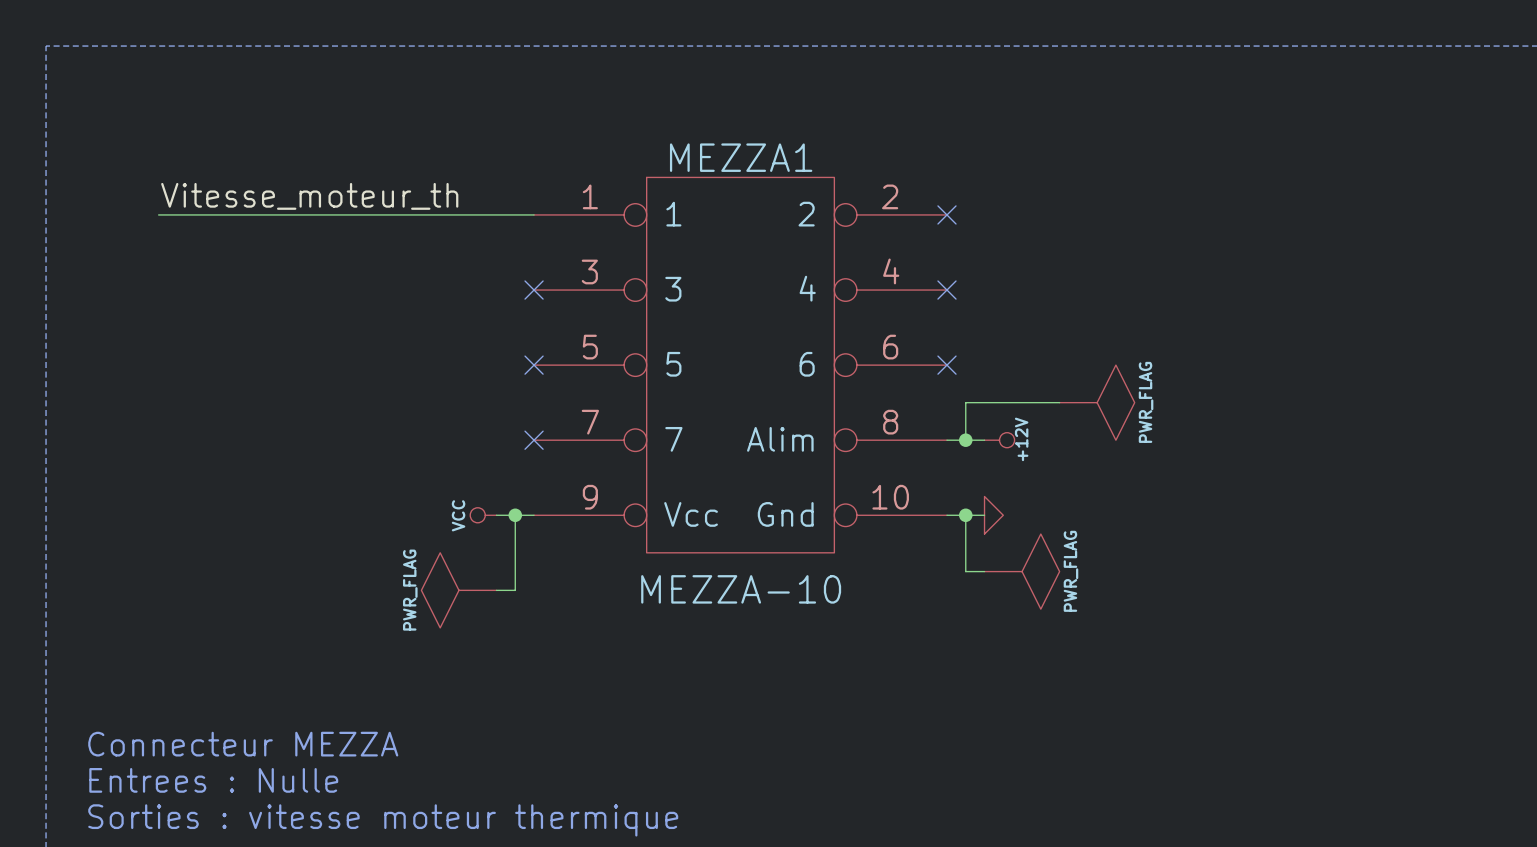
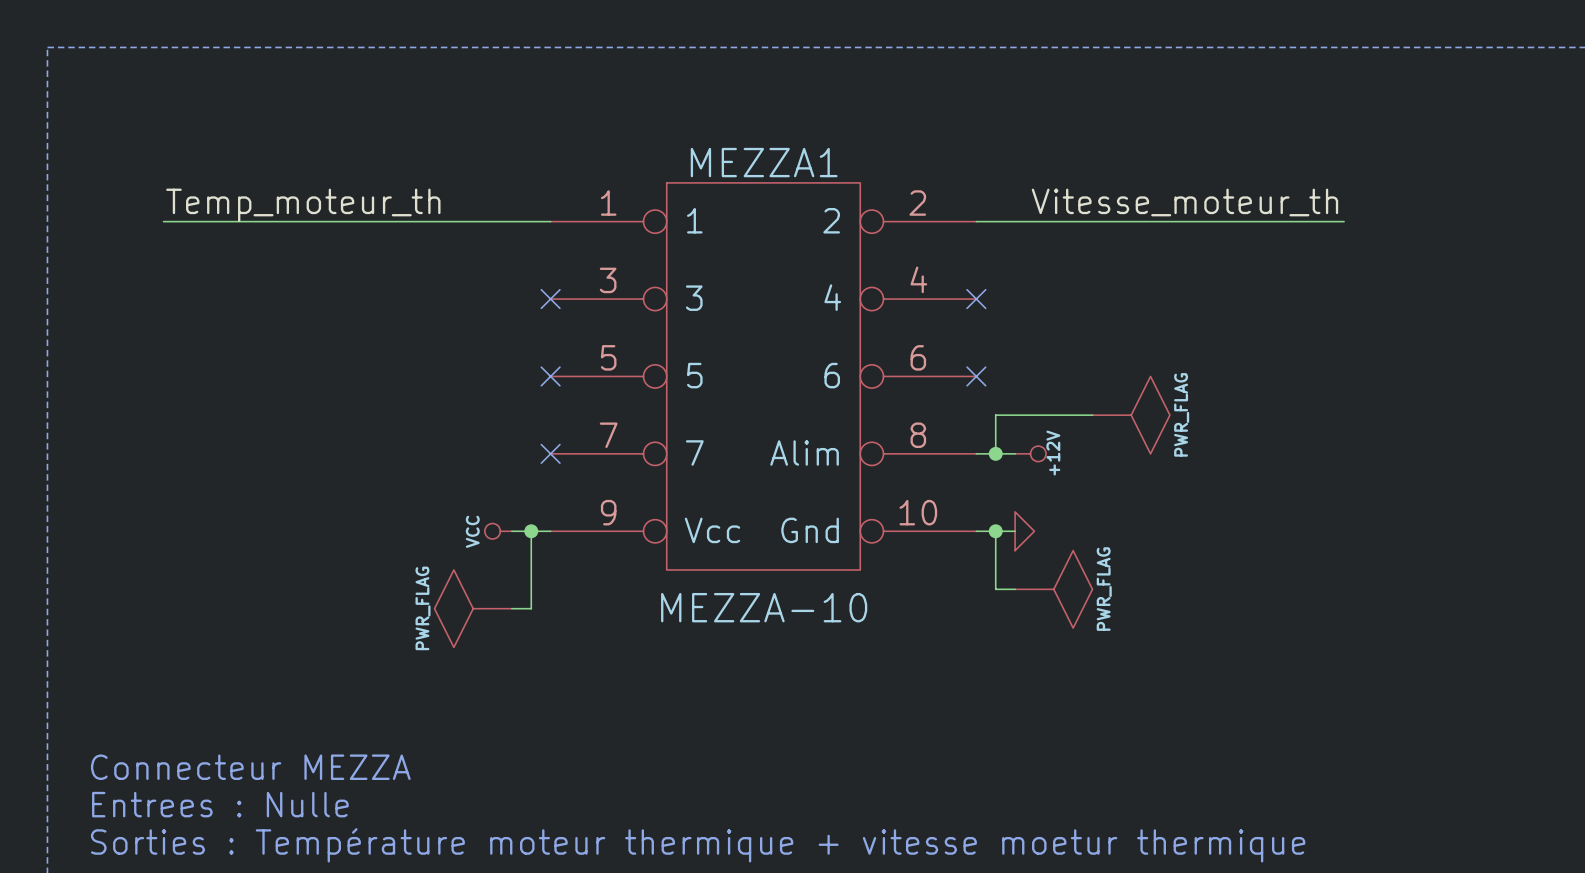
label: Vitesse_moteur_th (309, 196) -> Temp_moteur_th (303, 205)
label: none -> Vitesse_moteur_th (1184, 202)
wire: none -> (976, 221) (1344, 221)
no-connect mark: (946, 214) -> none
text: Sorties : vitesse moteur thermique (383, 820) -> Sorties : Température moteur thermique + vitesse moetur thermique (698, 845)

